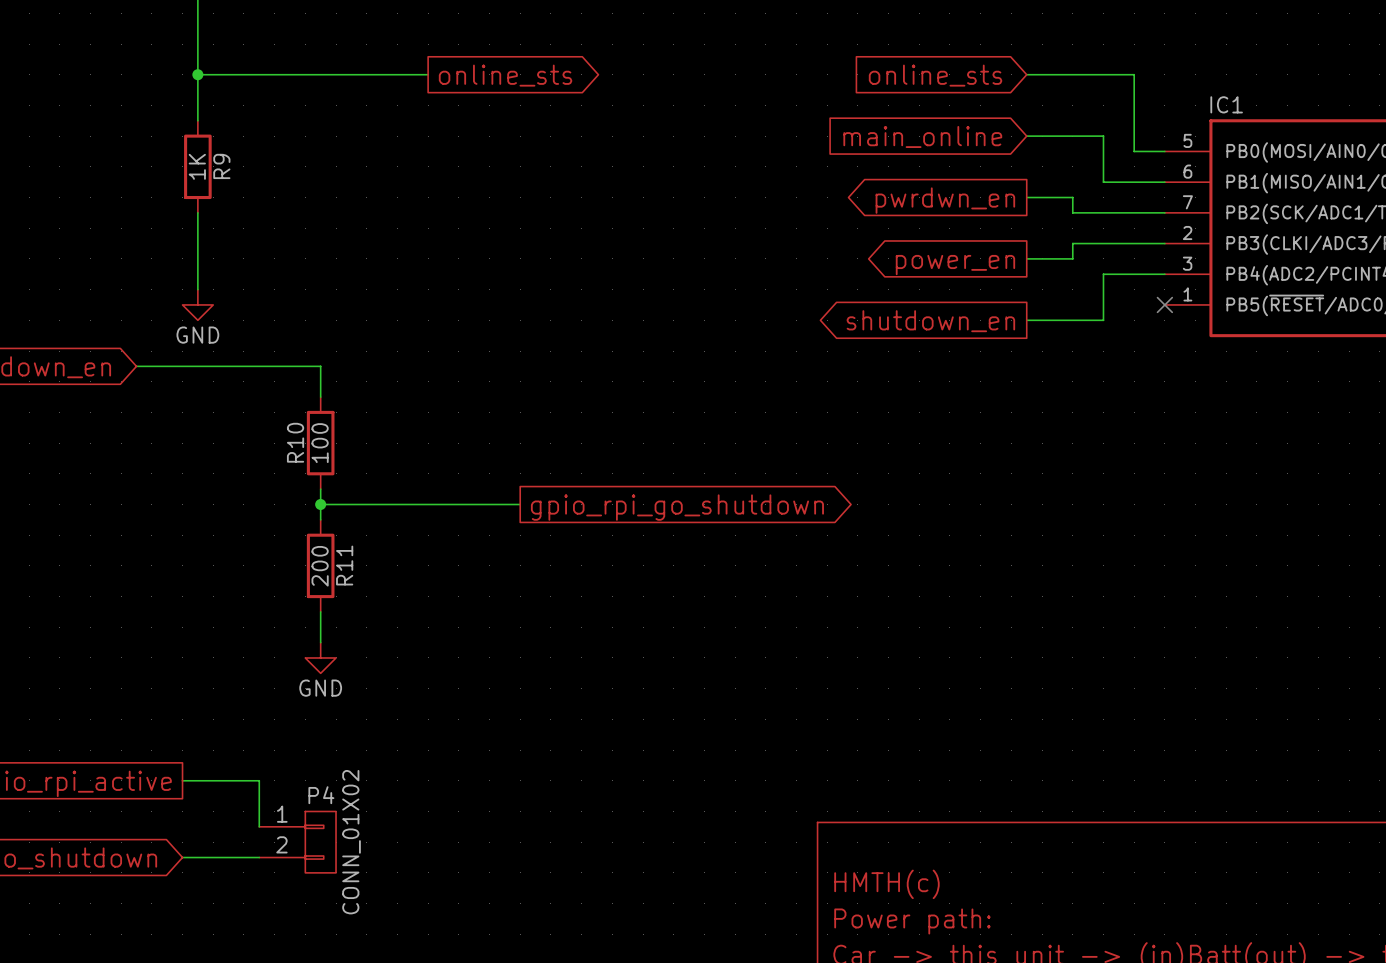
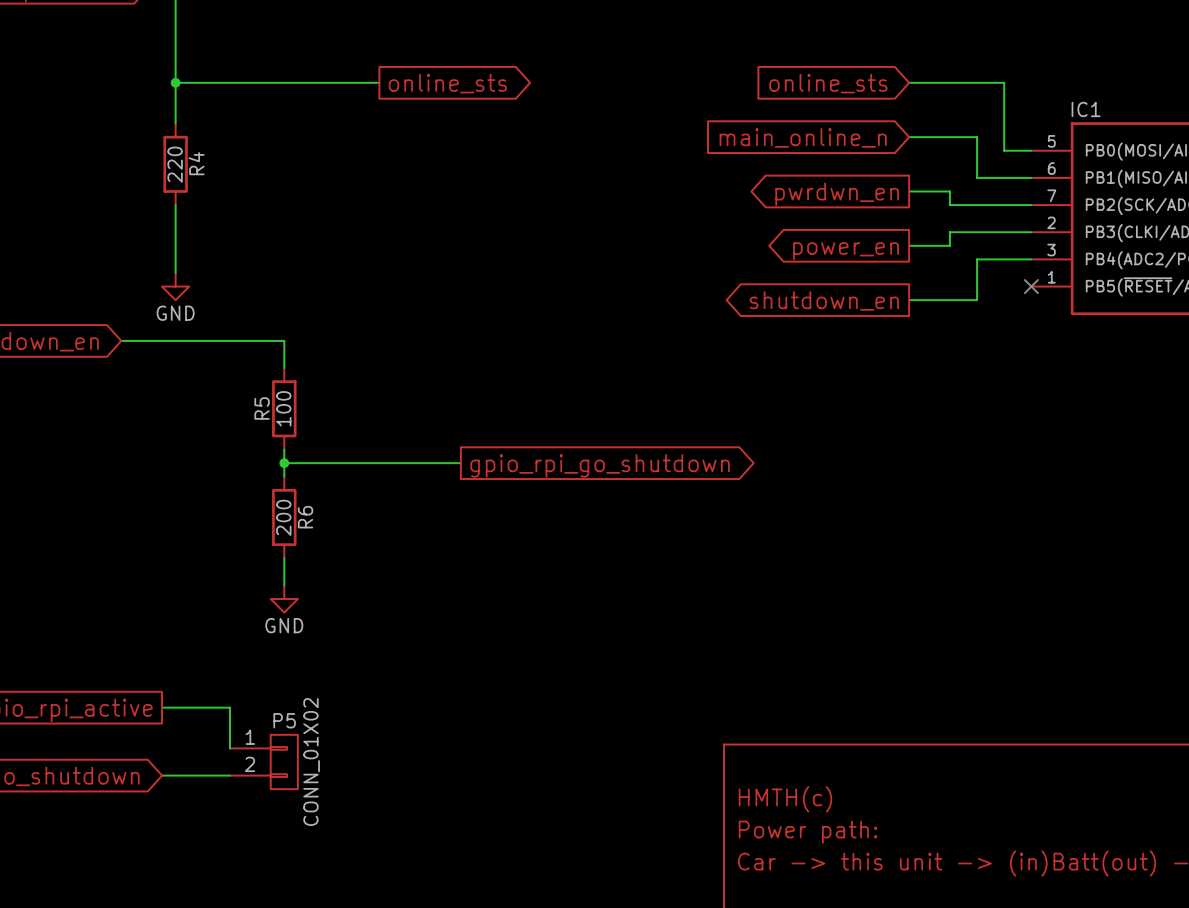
global label: main_online (922, 136) -> main_online_n (803, 137)
R9 value: 1K (197, 166) -> 220 (175, 164)
R9 name: R9 (221, 166) -> R4 (196, 163)
R10 name: R10 (295, 442) -> R5 (262, 408)
R11 name: R11 (344, 565) -> R6 (305, 517)
P4 name: P4 (321, 795) -> P5 (284, 720)

